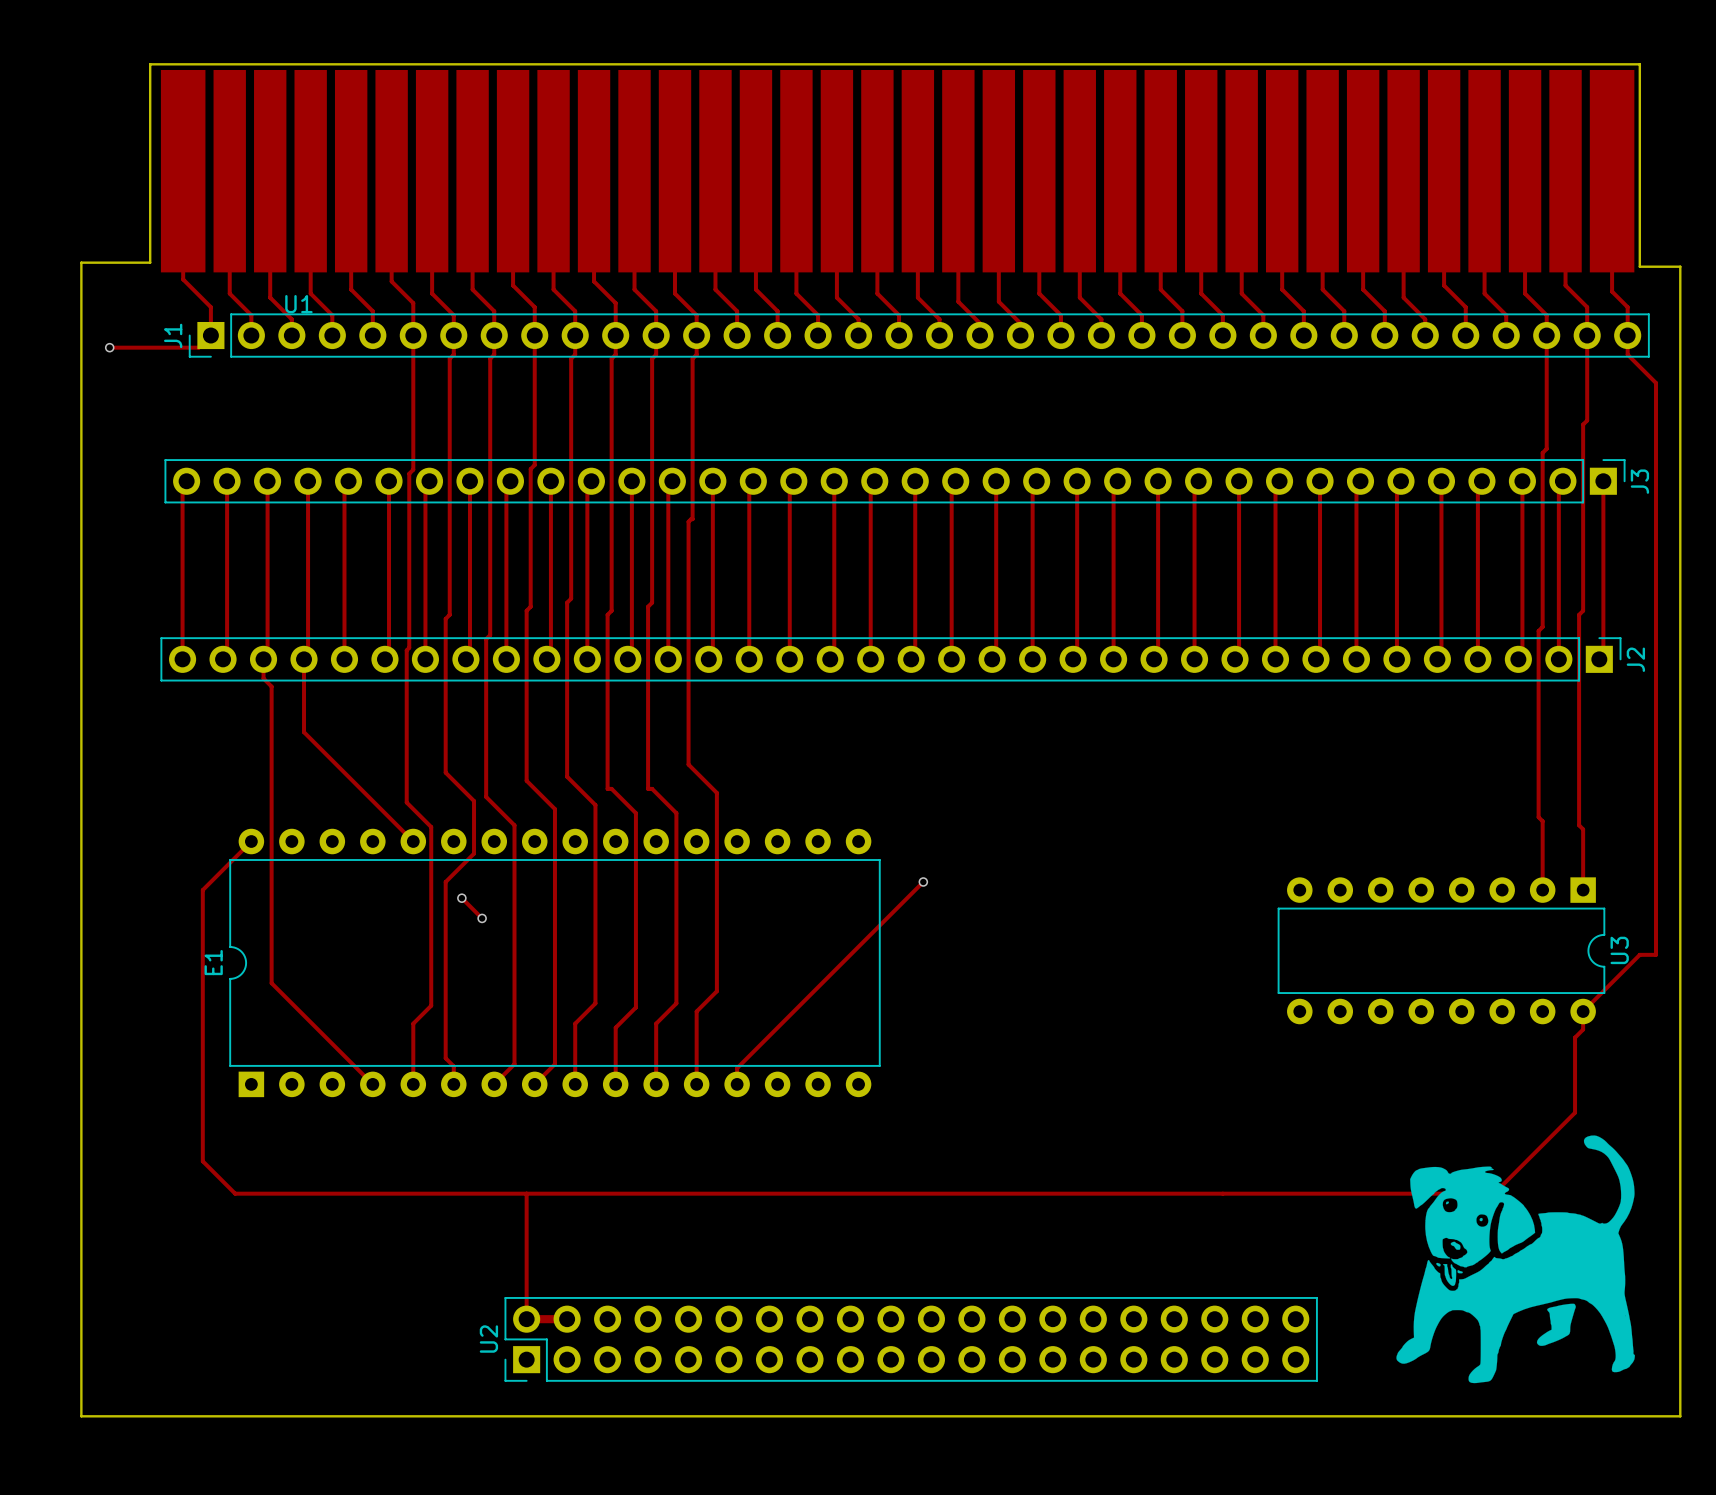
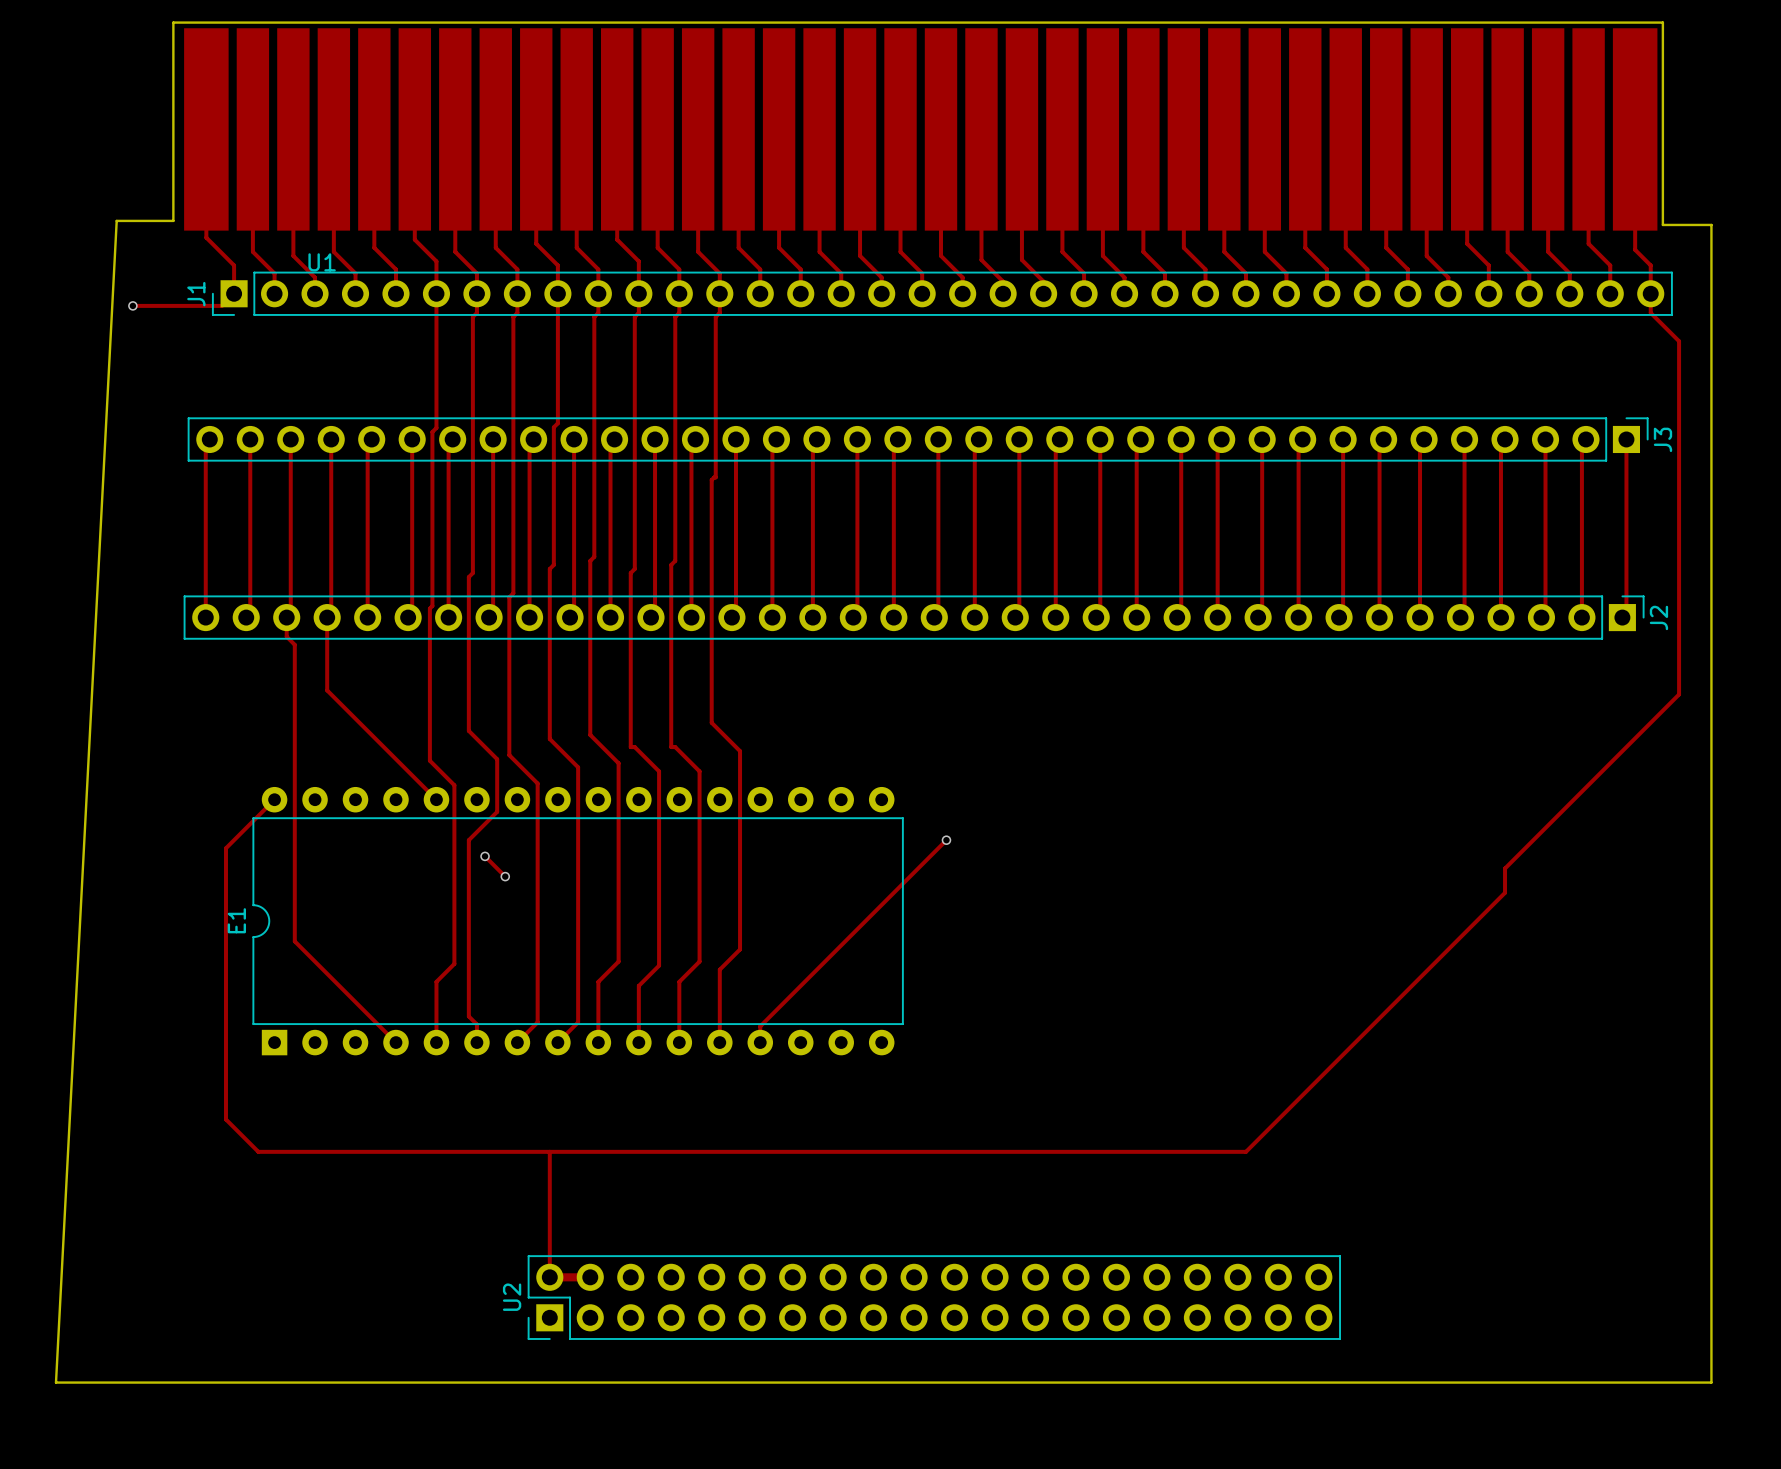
board edge: (93, 262) (81, 262) (81, 1416) (1680, 1416) (1680, 266) -> (116, 220) (56, 1382) (1711, 1382) (1711, 224) (1703, 224)
track: (1546, 335) (1546, 448) (1542, 452) (1542, 626) (1538, 631) (1538, 817) (1542, 821) (1542, 890) -> none
track: (1587, 335) (1587, 420) (1583, 424) (1583, 610) (1579, 614) (1579, 825) (1583, 829) (1583, 890) -> none
track: (1656, 736) (1656, 954) (1639, 954) (1583, 1011) (1583, 1029) (1575, 1037) (1575, 1112) (1494, 1193) (1222, 1193) -> (1679, 694) (1505, 868) (1505, 892) (1245, 1151)
U3: (1441, 950) -> none
drawing: [1396, 1135, 1635, 1384] -> none

